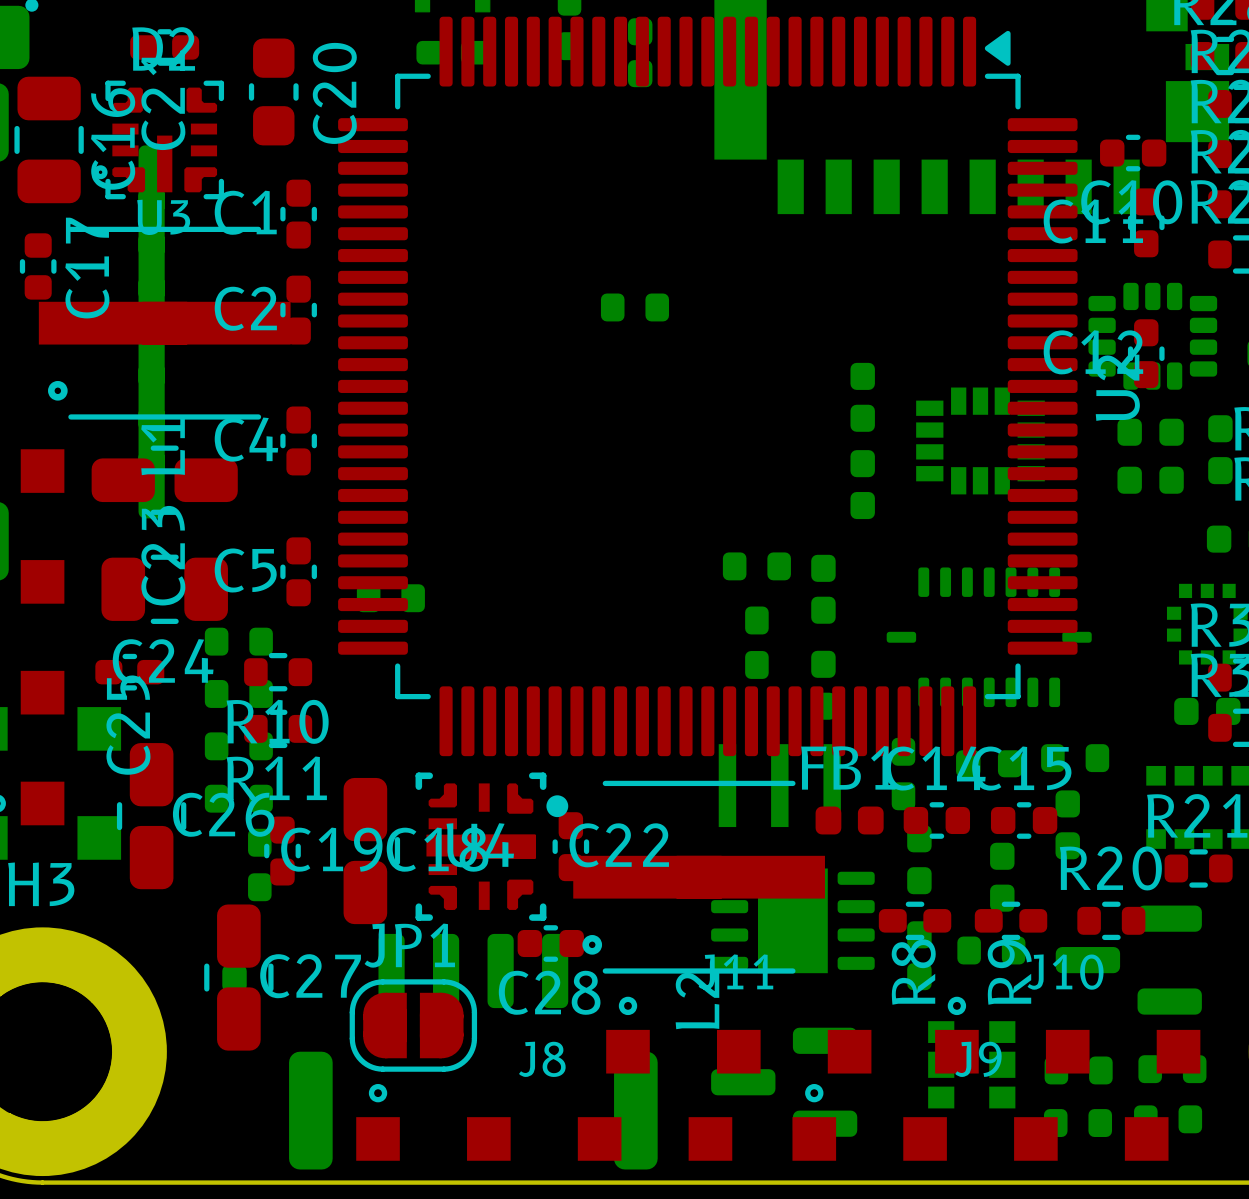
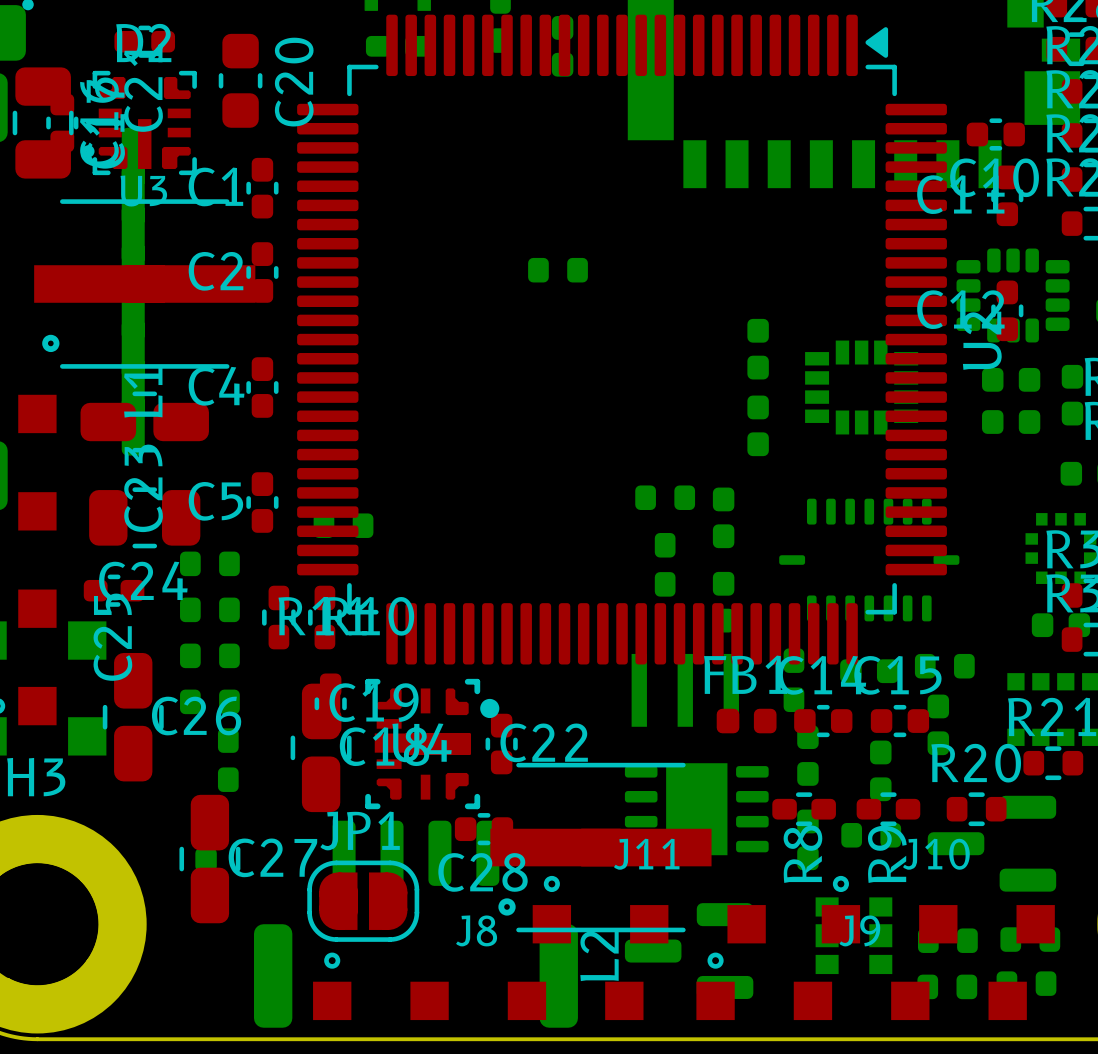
C17 position: (38, 266) -> (62, 122)
R10 footprint: [244, 652, 313, 692] -> [308, 585, 342, 650]
R11 footprint: [244, 709, 313, 749] -> [262, 585, 296, 650]
C19 position: (282, 851) -> (330, 703)
L2 position: (699, 877) -> (600, 847)

